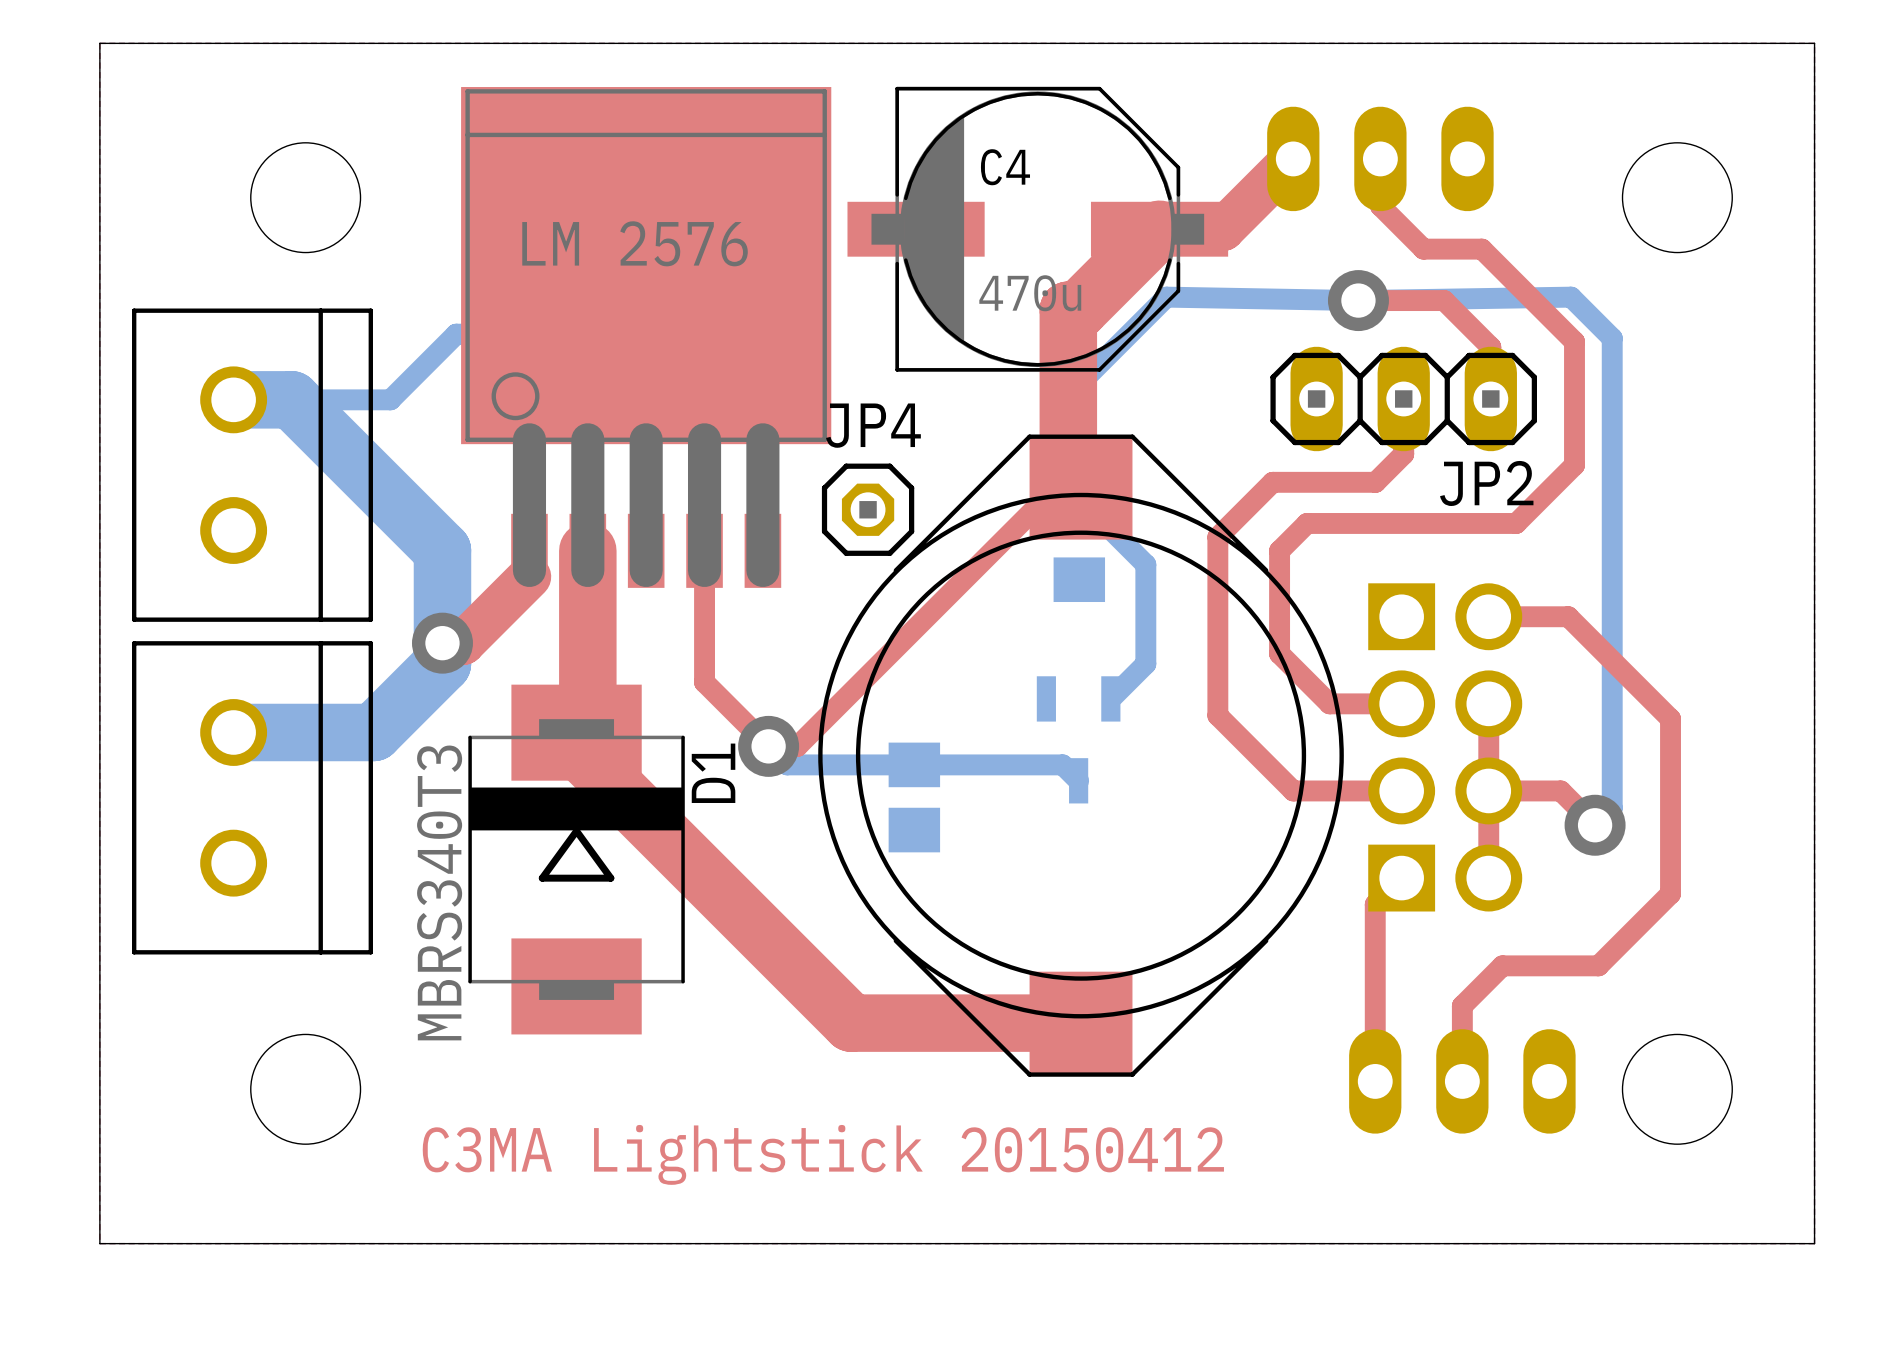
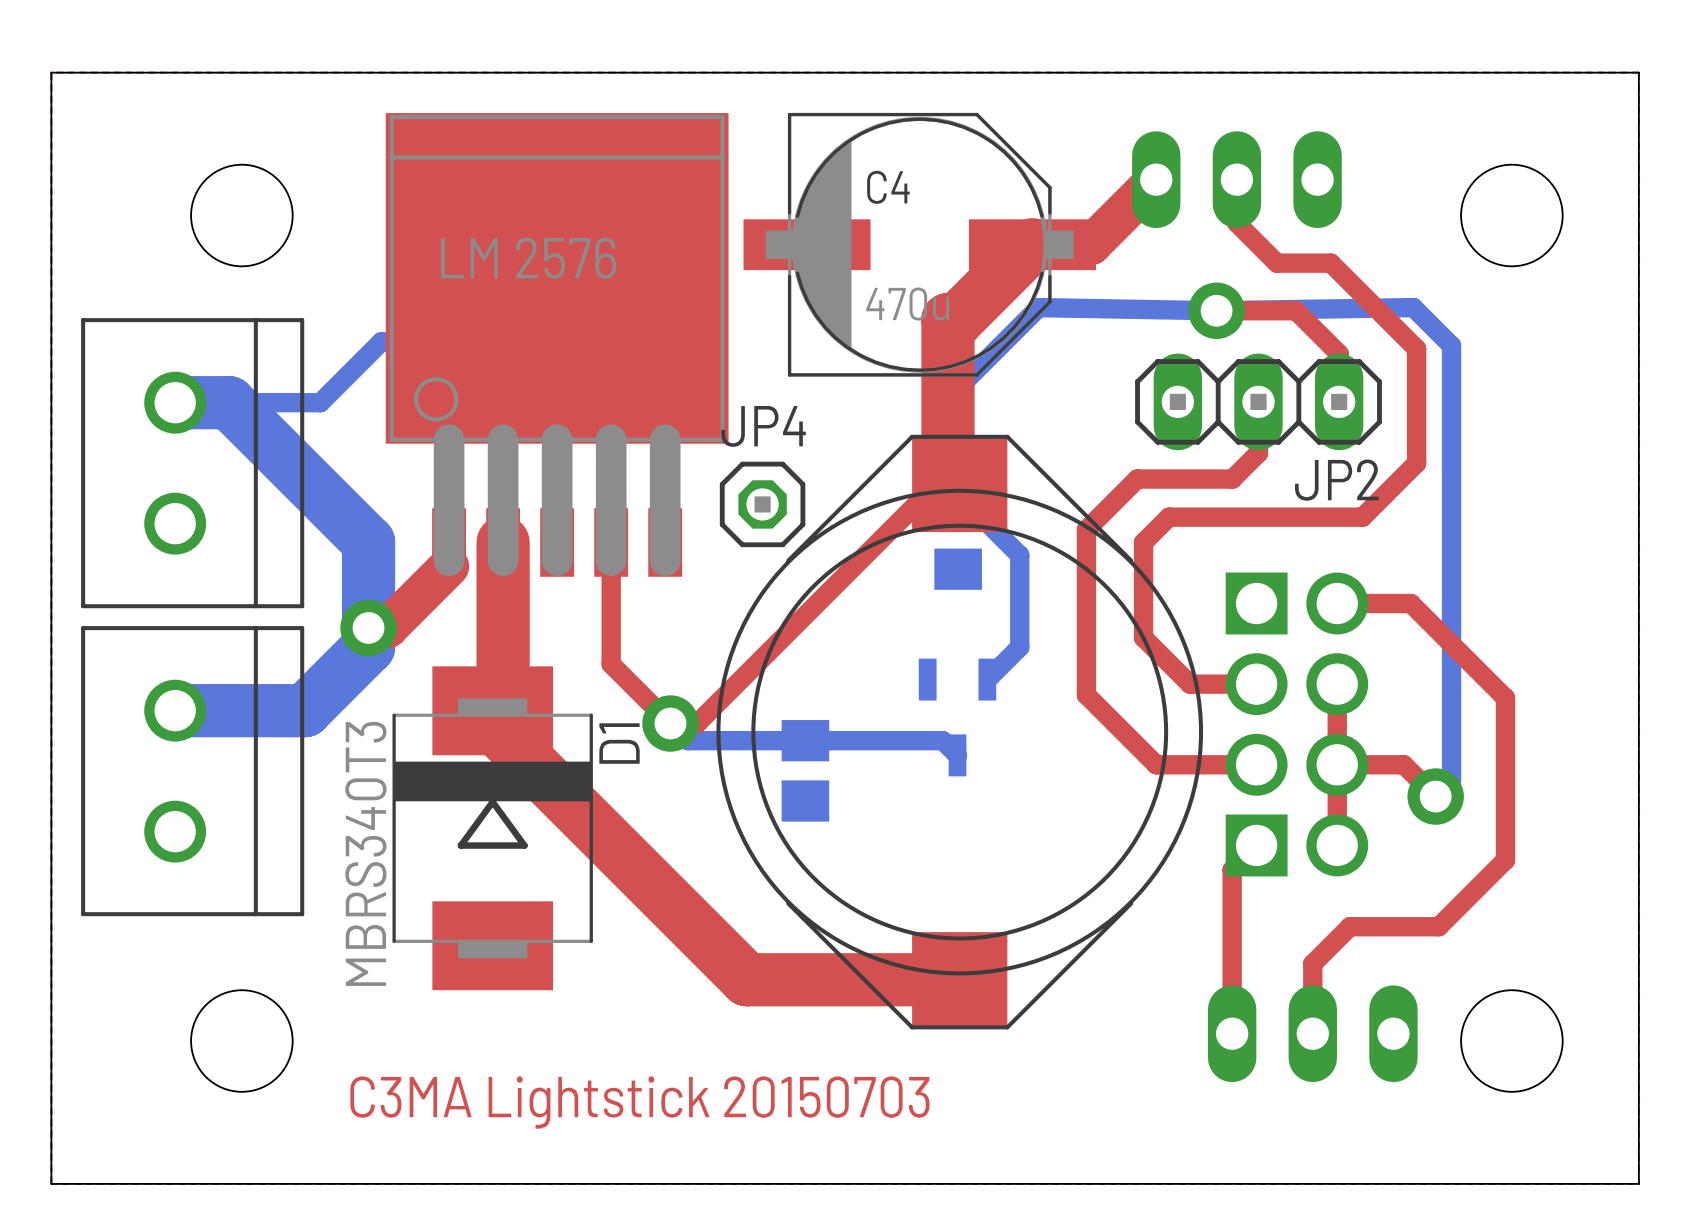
text: C3MA Lightstick 20150412 (823, 1154) -> C3MA Lightstick 20150703 (639, 1102)

